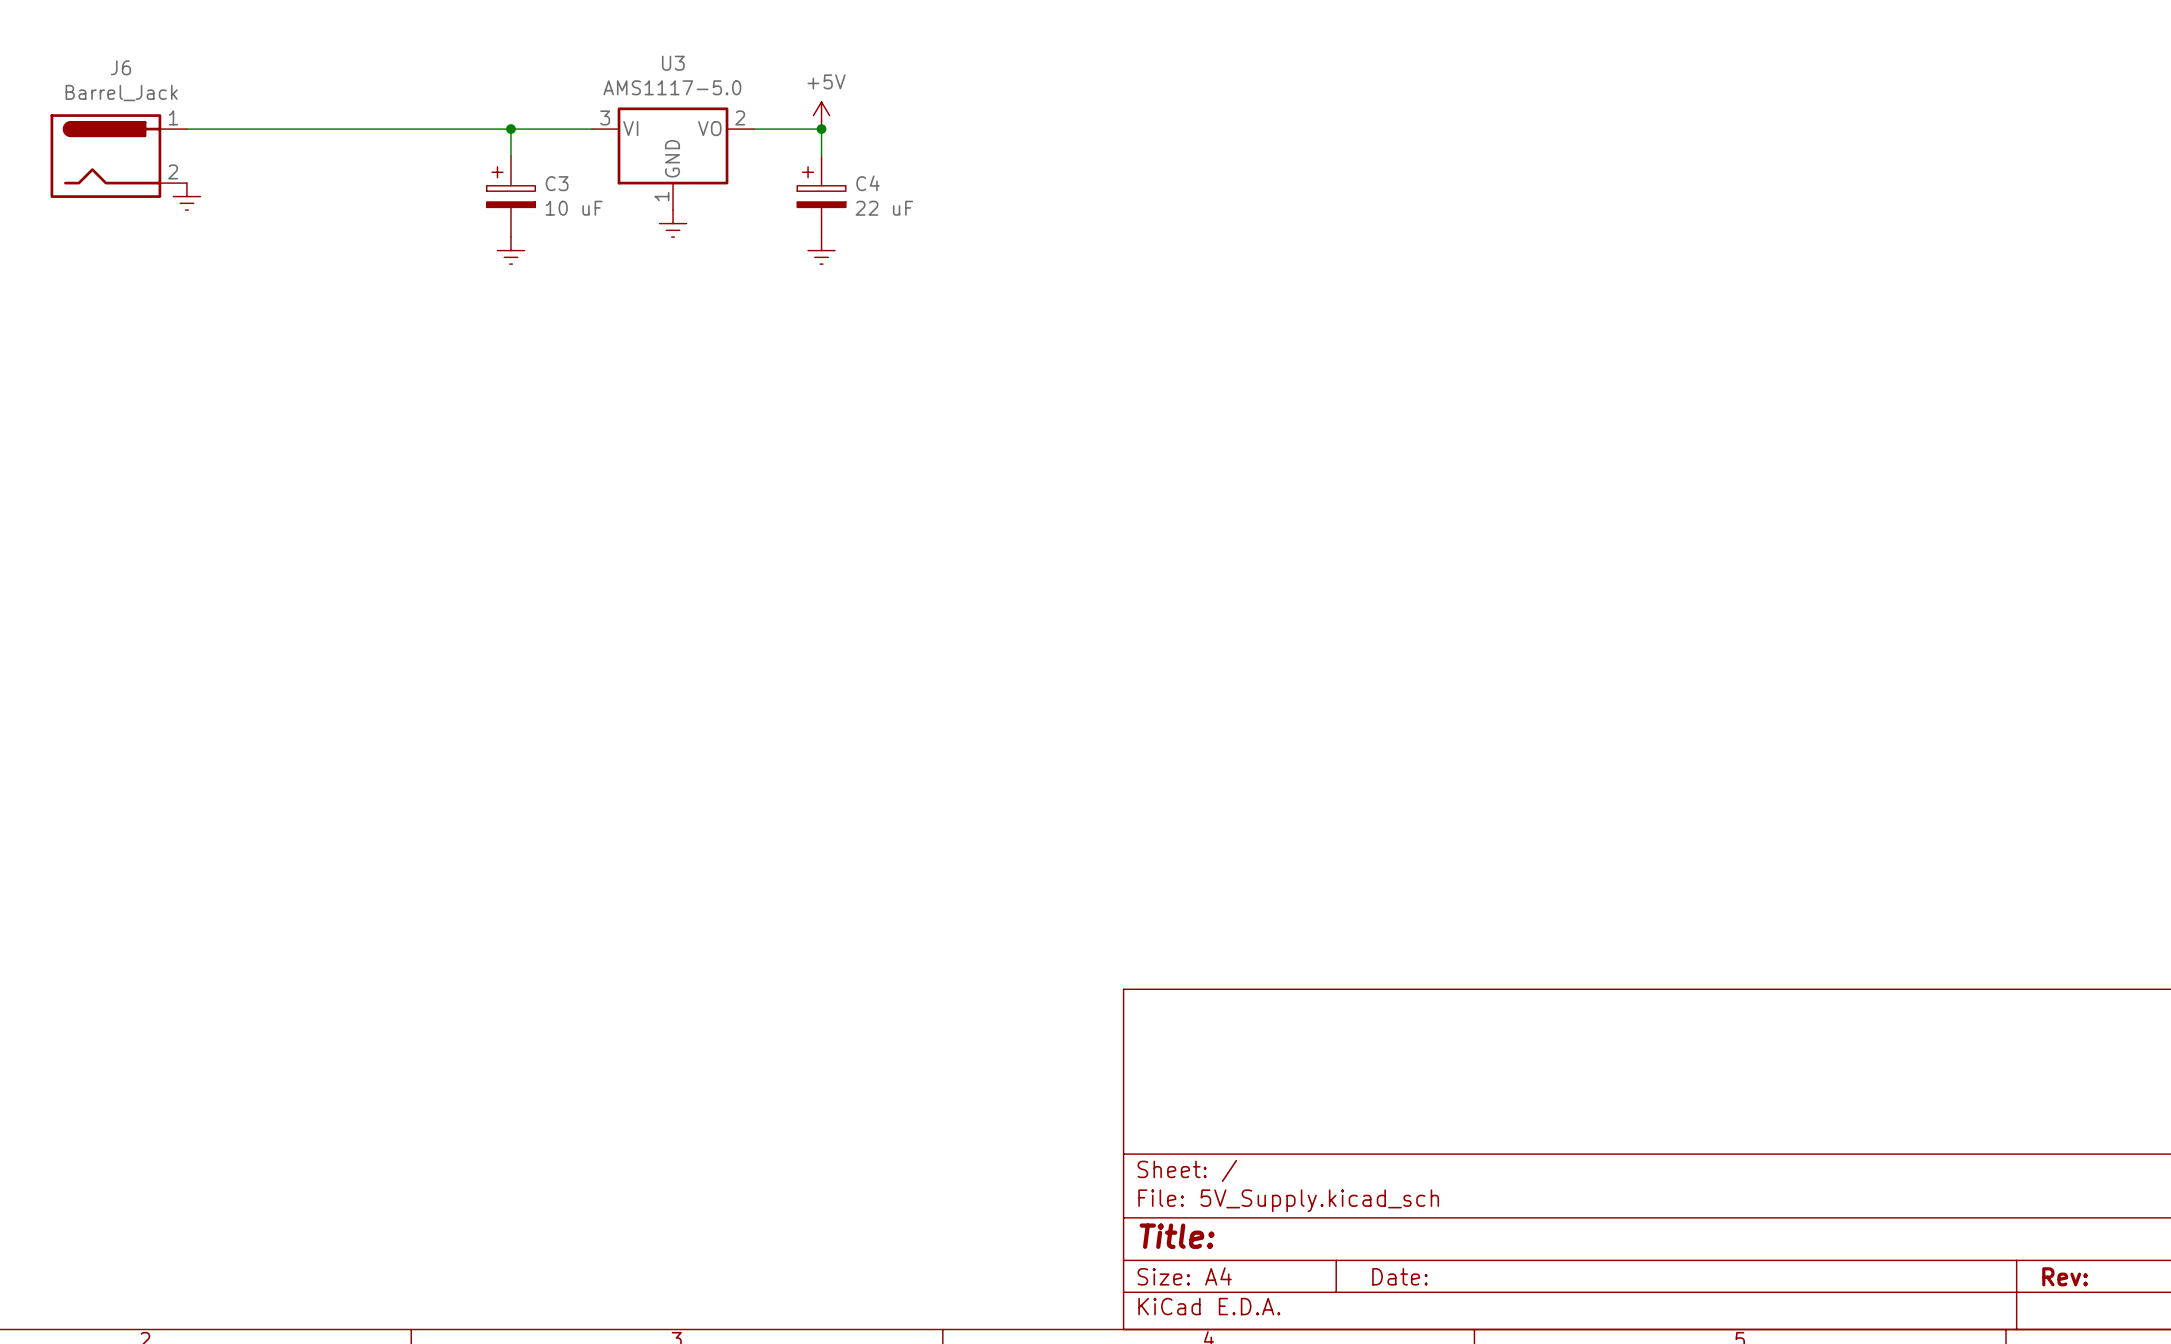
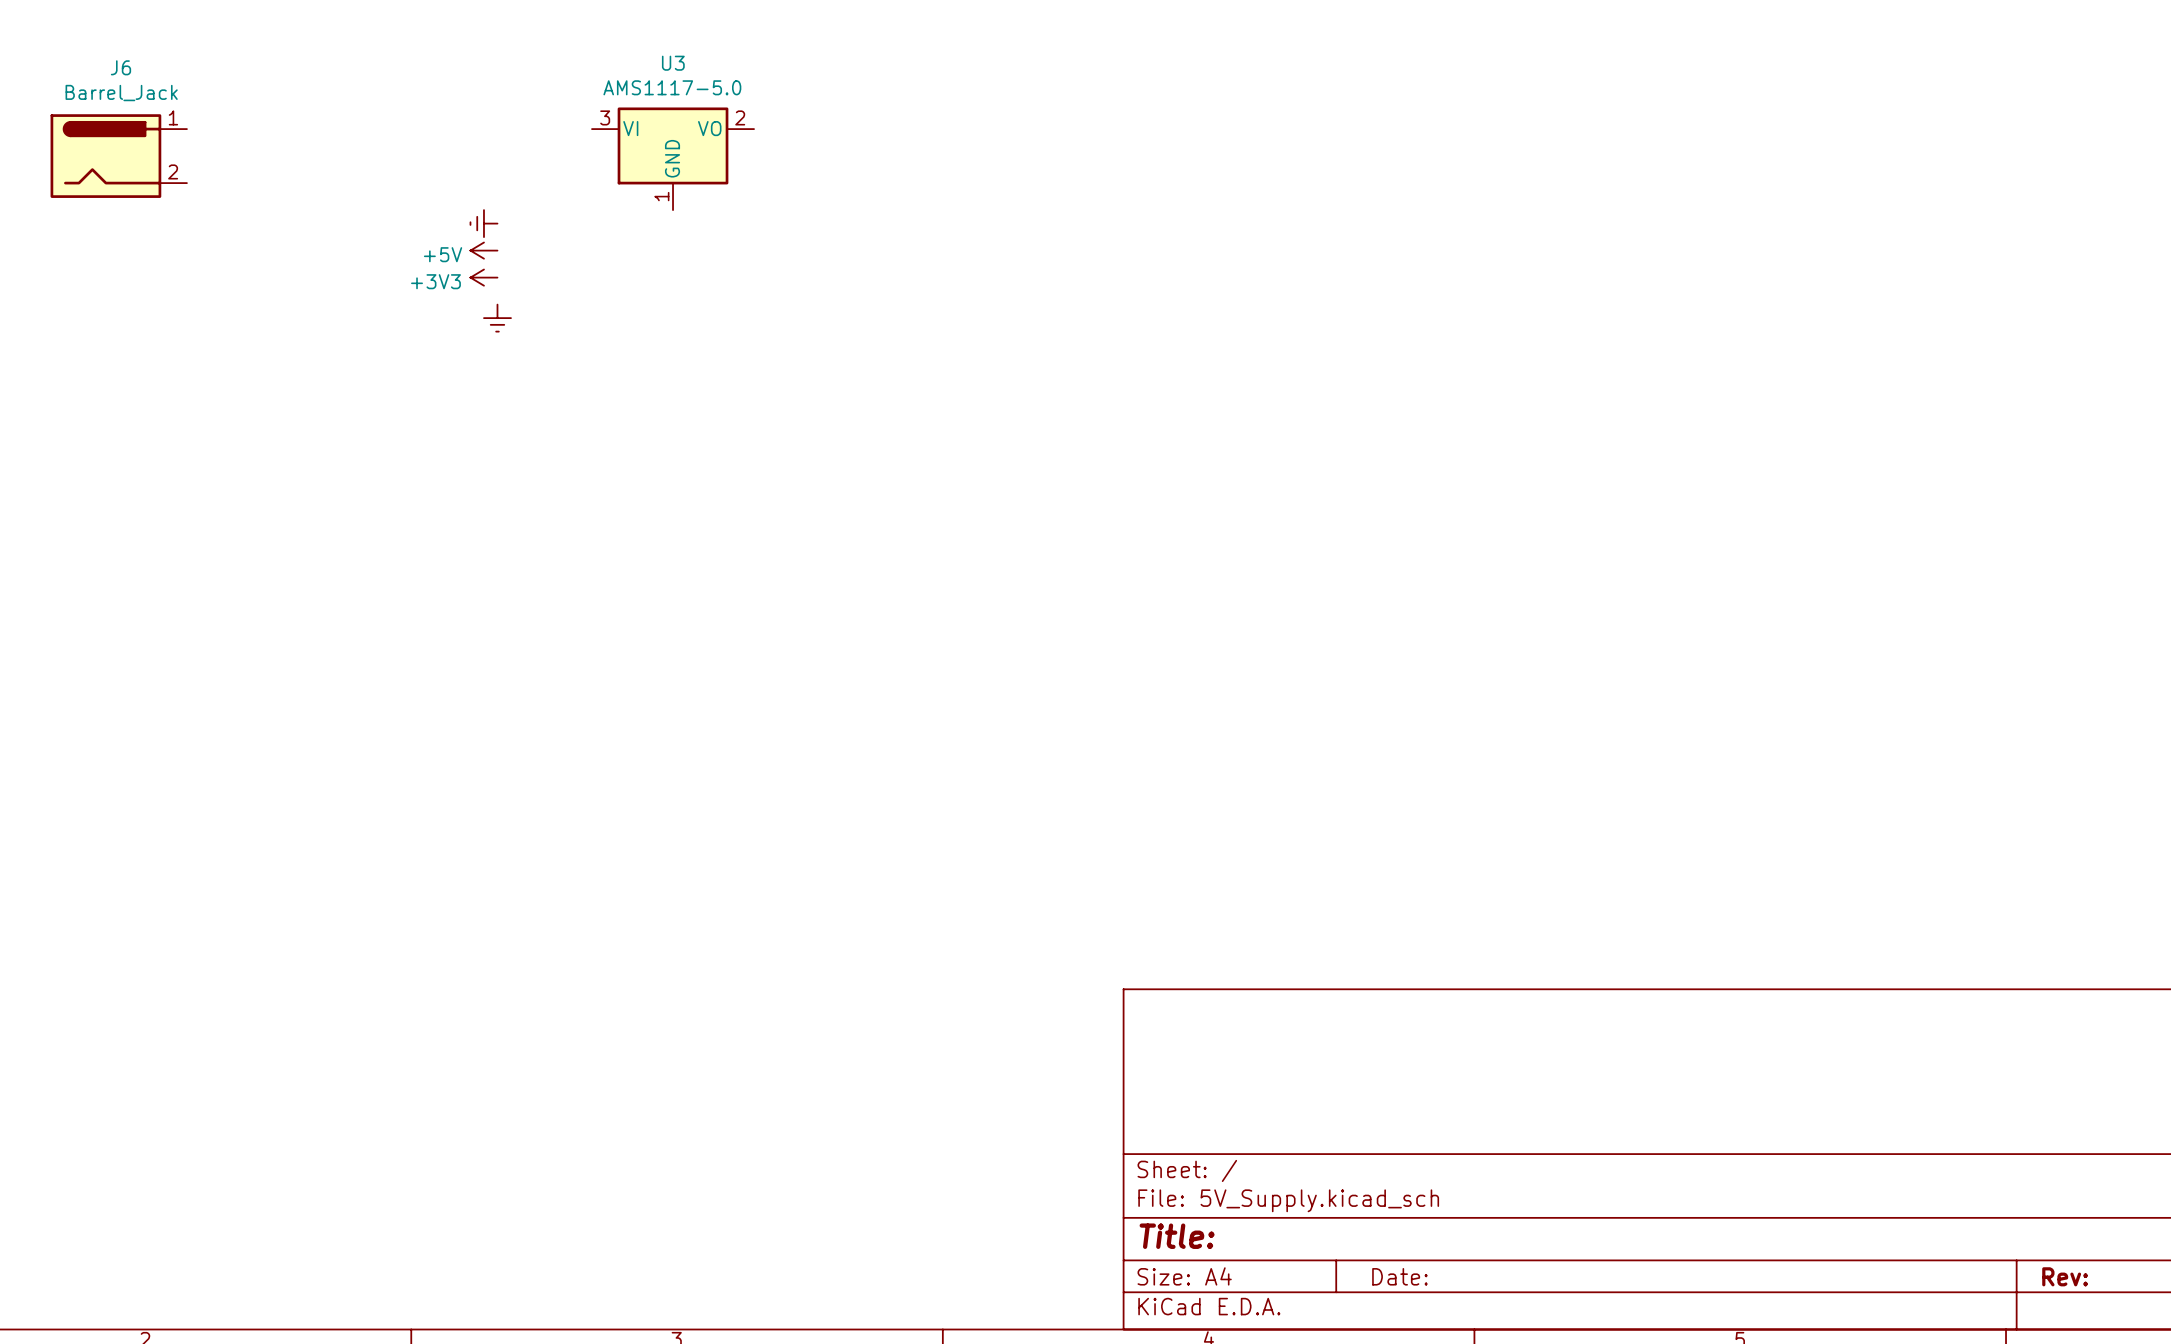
power symbol: +5V (821, 115) -> none
wire: (186, 129) (592, 129) -> none
wire: (510, 129) (510, 156) -> none
junction: (510, 129) -> none
wire: (754, 129) (821, 129) (821, 156) -> none
junction: (821, 129) -> none
power symbol: (186, 196) -> none
C3: 10 uF (510, 196) -> none
C4: 22 uF (821, 196) -> none
power symbol: none -> (483, 223)
power symbol: (673, 223) -> none
power symbol: none -> +5V (483, 250)
power symbol: (510, 250) -> none
power symbol: (821, 250) -> none
power symbol: none -> +3V3 (483, 277)
power symbol: none -> (497, 318)

